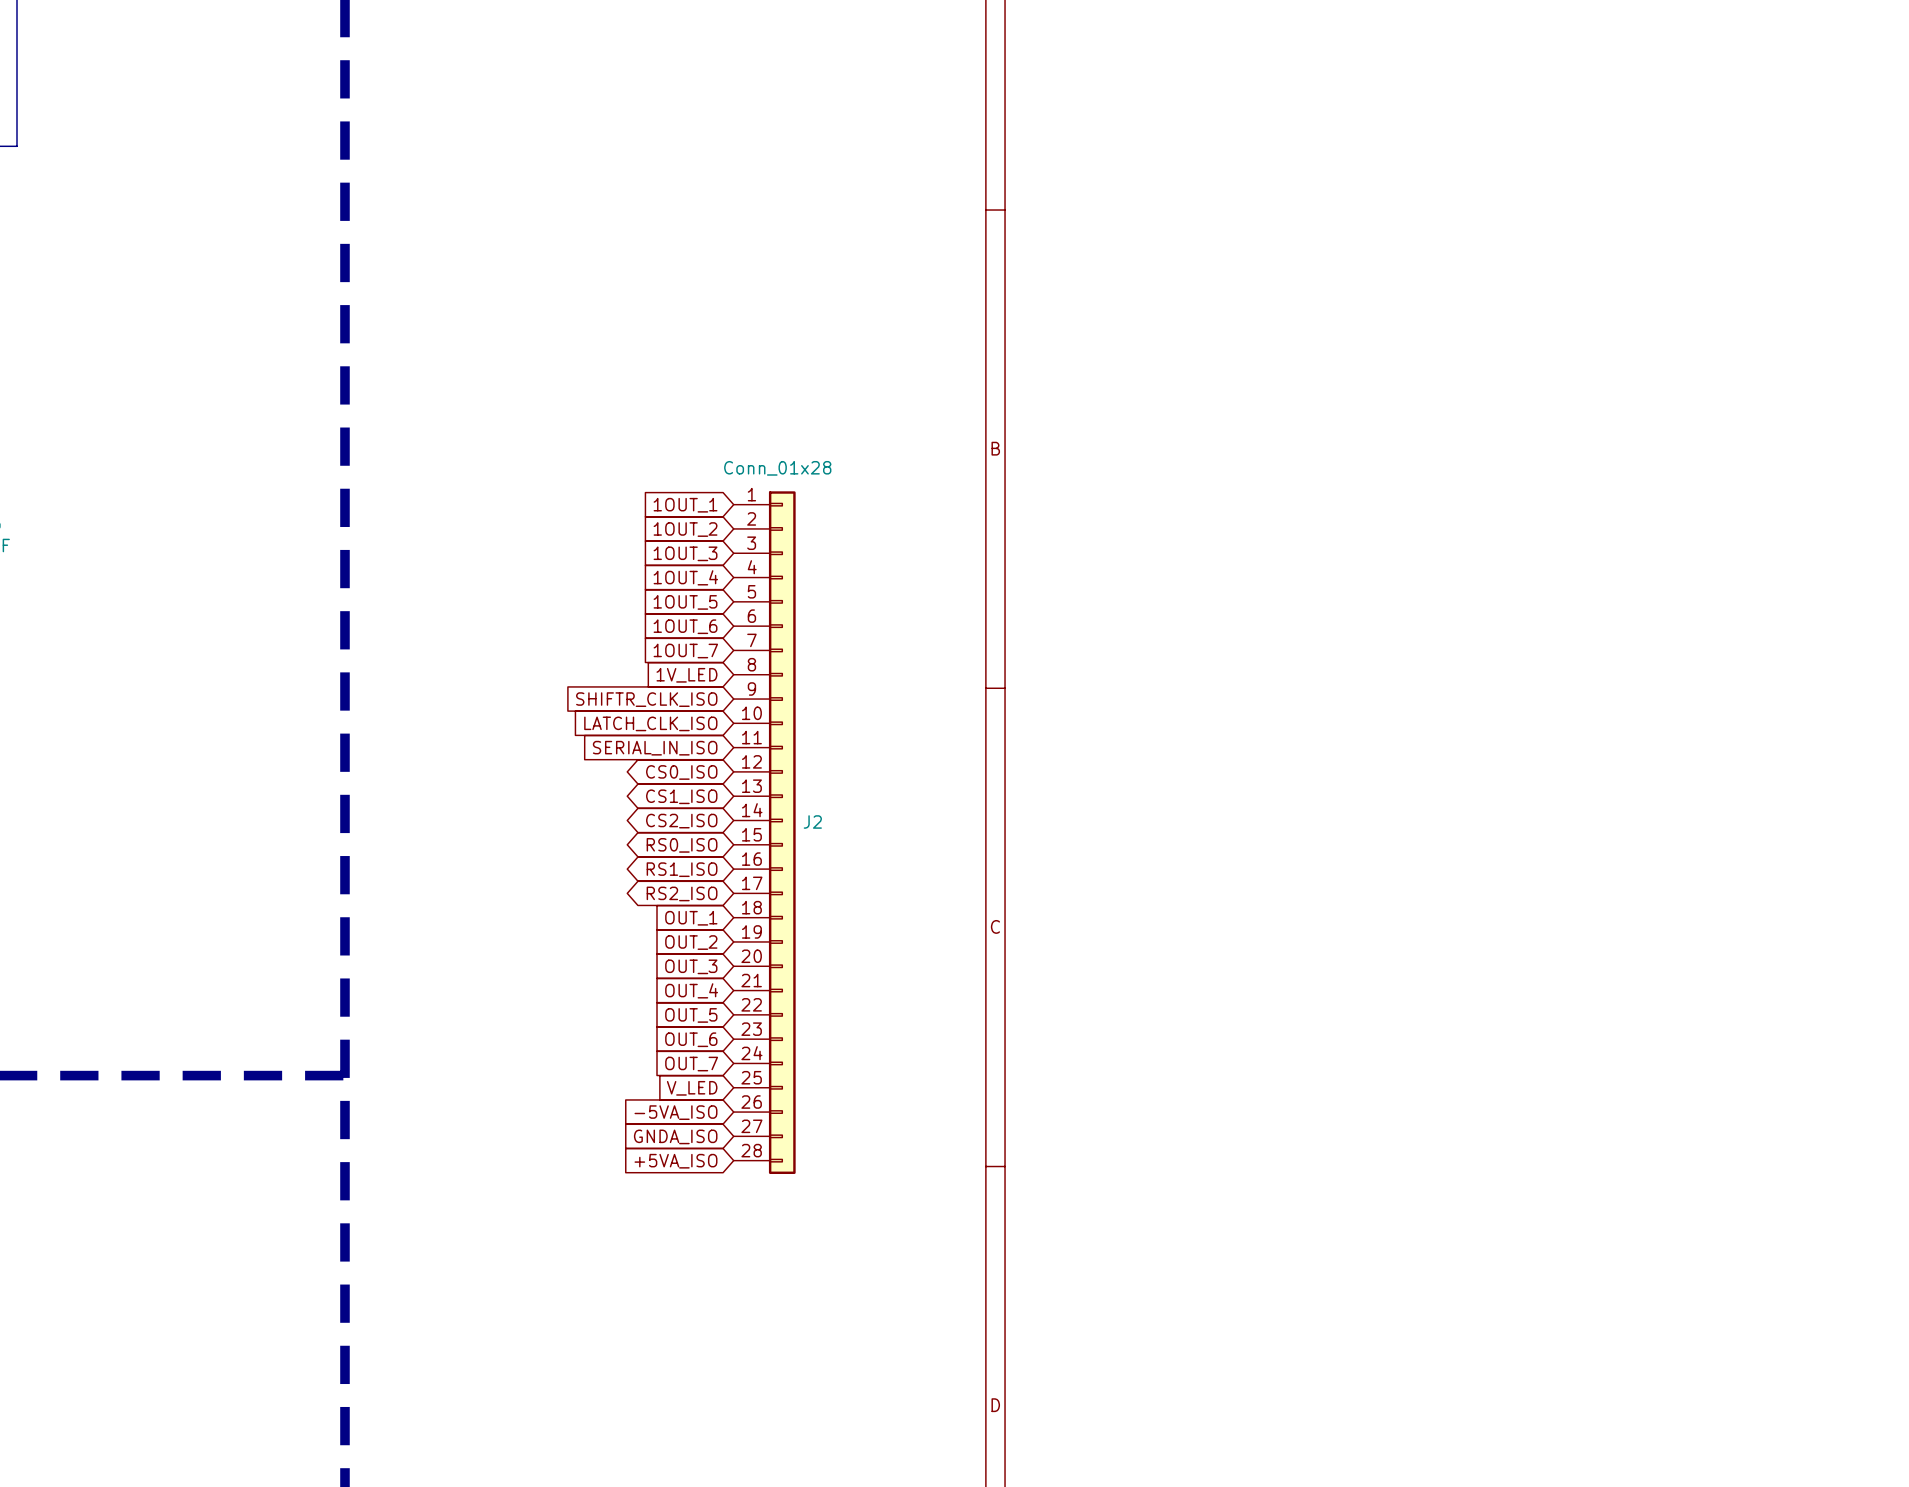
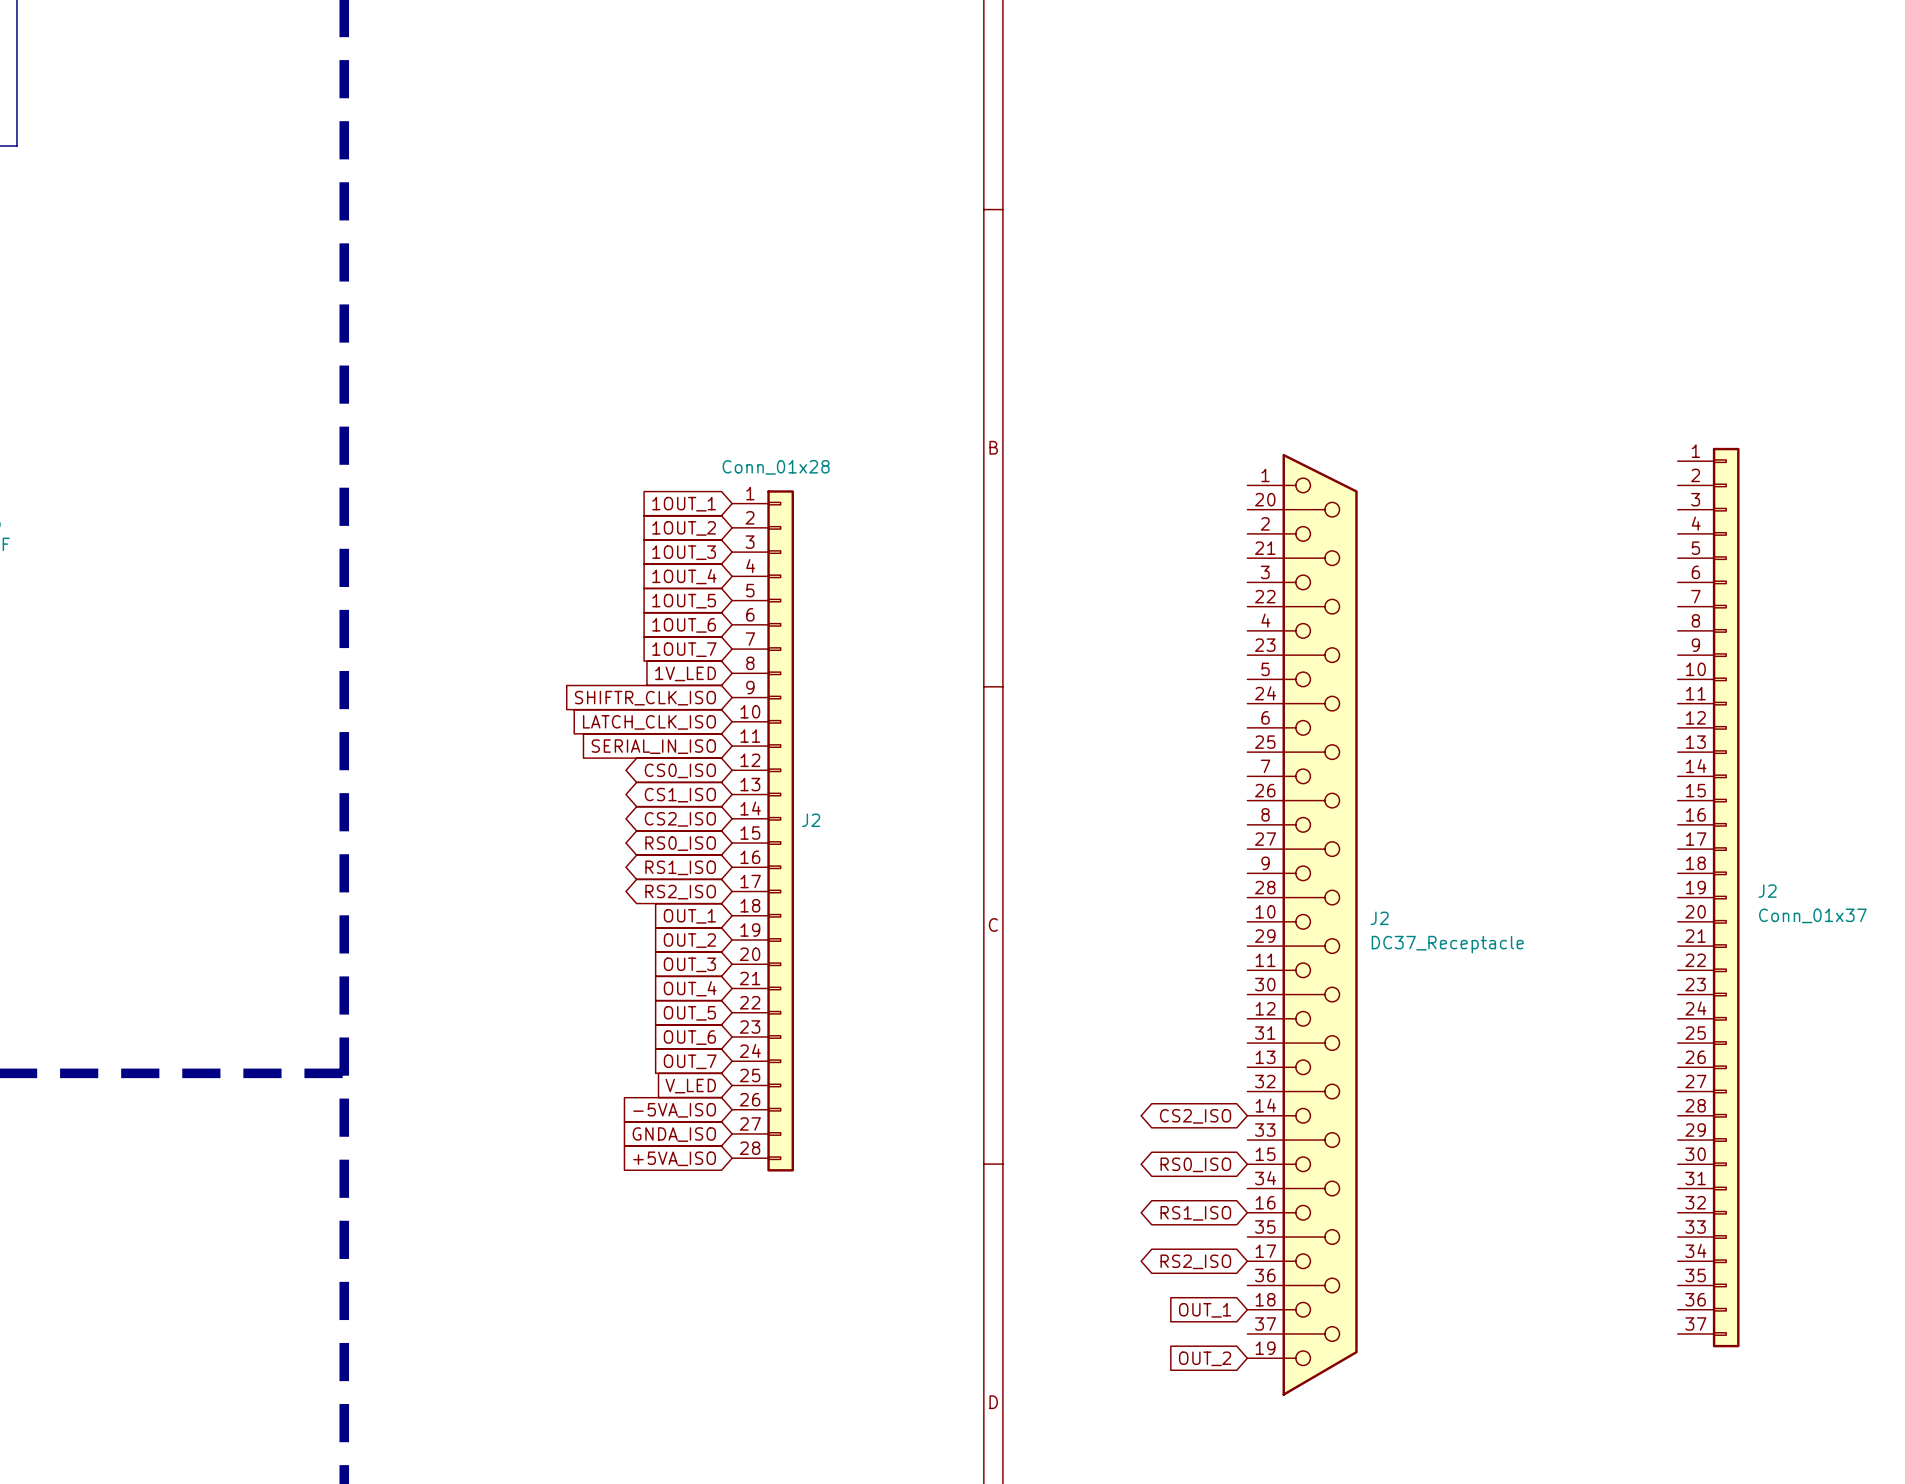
J2: none -> Conn_01x37 (1708, 897)
J2: none -> DC37_Receptacle (1302, 924)
global label: none -> CS2_ISO (1195, 1116)
global label: none -> RS0_ISO (1195, 1164)
global label: none -> RS1_ISO (1195, 1213)
global label: none -> RS2_ISO (1195, 1261)
global label: none -> OUT_1 (1205, 1310)
global label: none -> OUT_2 (1205, 1358)

